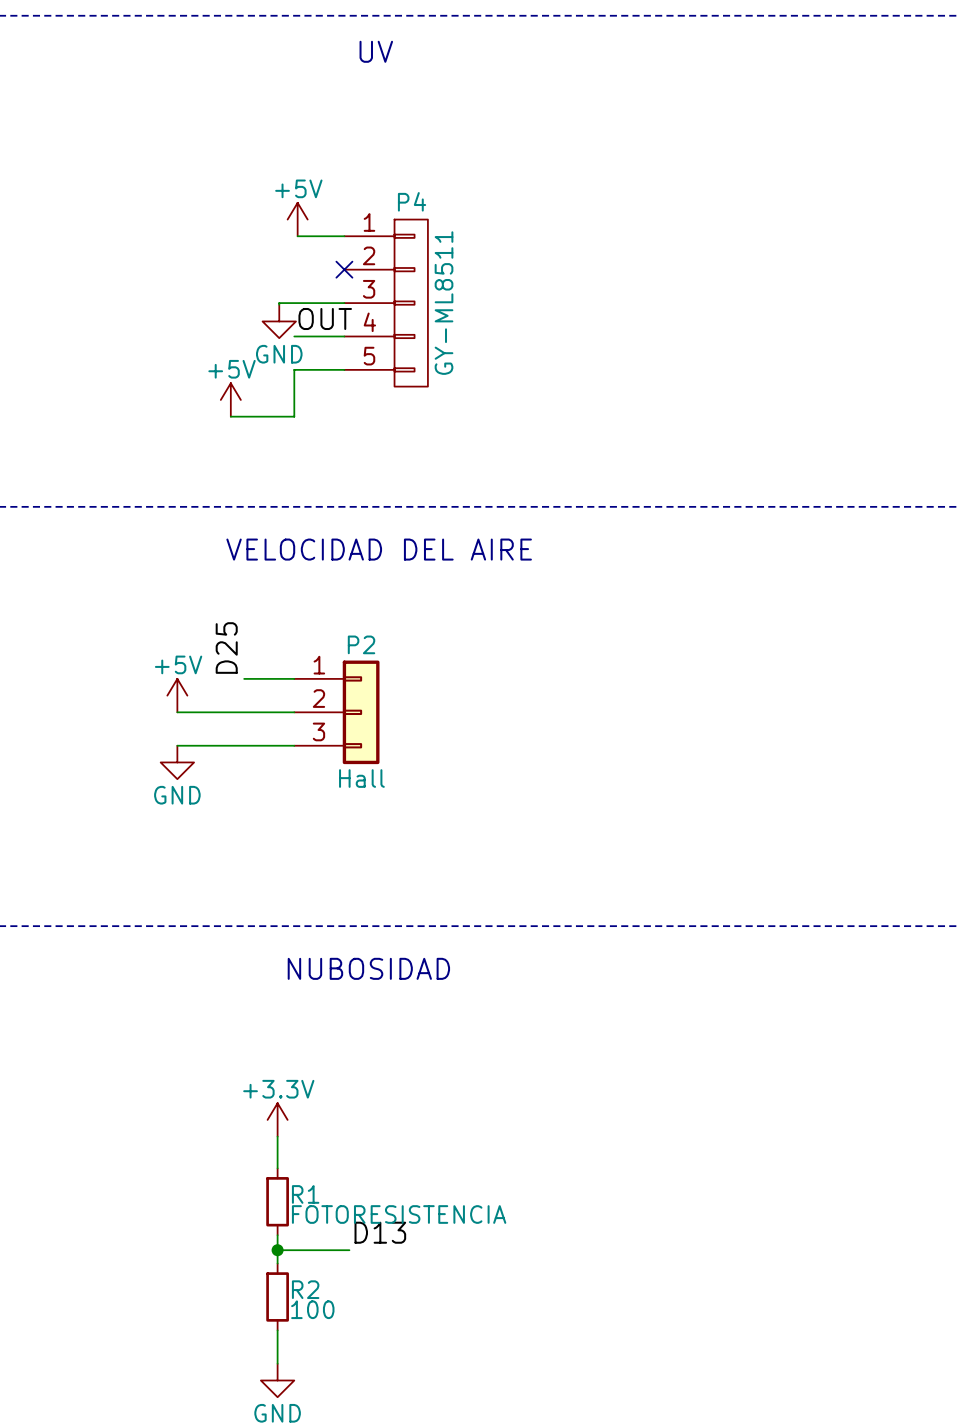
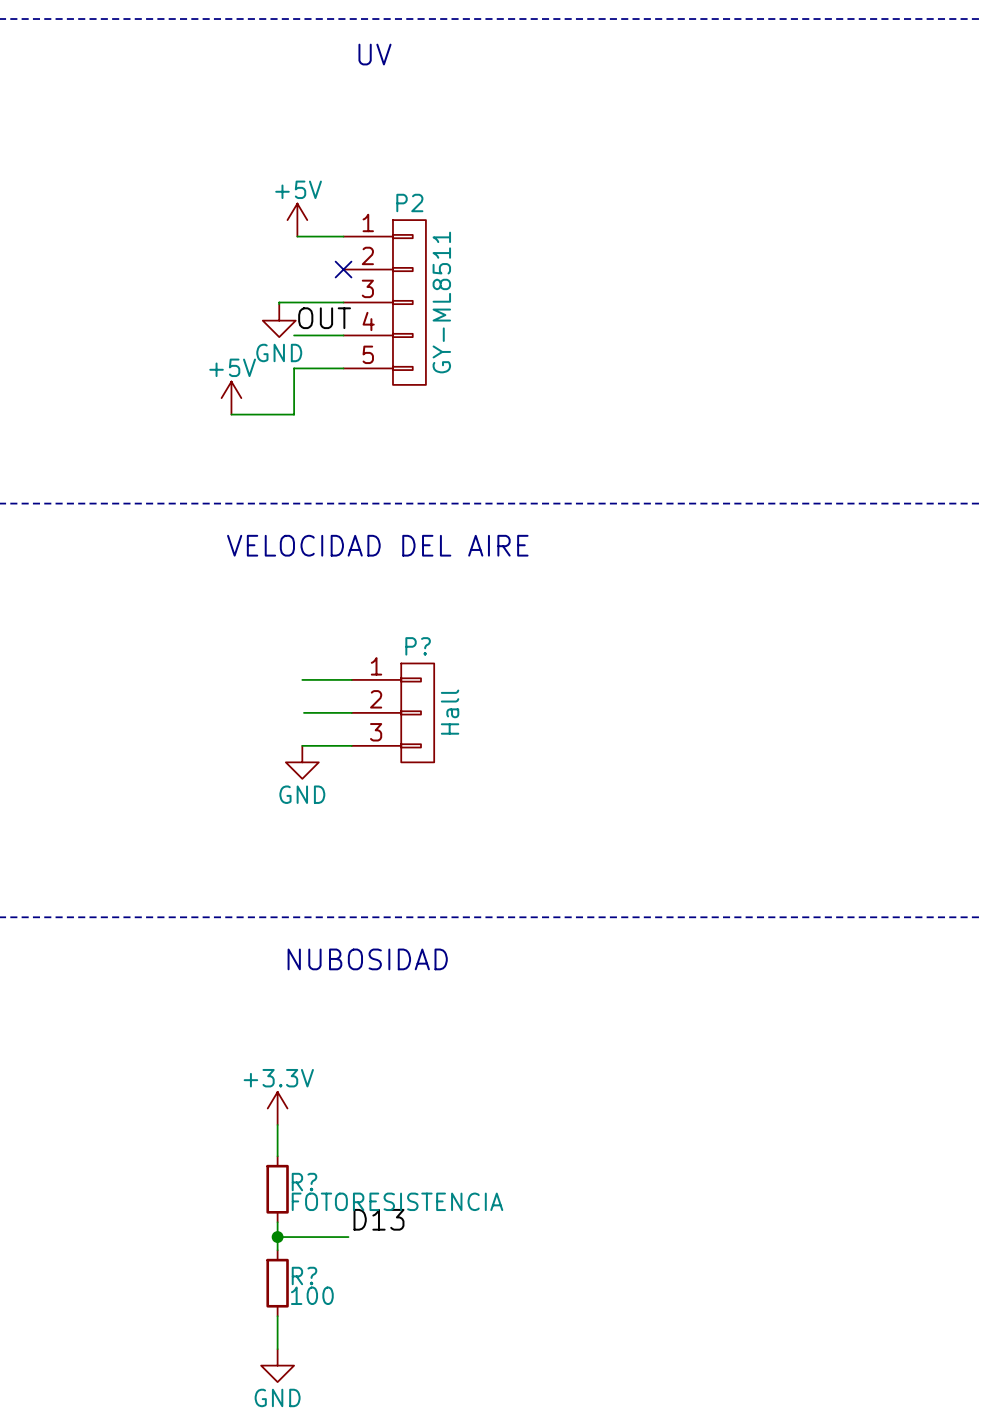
P4 name: P4 (412, 201) -> P2 (409, 202)
label: D25 (226, 648) -> none
wire: (244, 678) (294, 678) -> (302, 679) (351, 679)
power symbol: +5V (177, 695) -> none
wire: (177, 712) (294, 712) -> none
P2: Hall (336, 712) -> none
wire: none -> (303, 712) (351, 712)
P?: none -> Hall (392, 712)
wire: (177, 745) (294, 745) -> none
wire: none -> (302, 745) (351, 745)
power symbol position: GND (177, 762) -> GND (302, 762)
R1 name: R1 (305, 1194) -> R? (304, 1182)
R2 name: R2 (305, 1289) -> R? (304, 1275)

